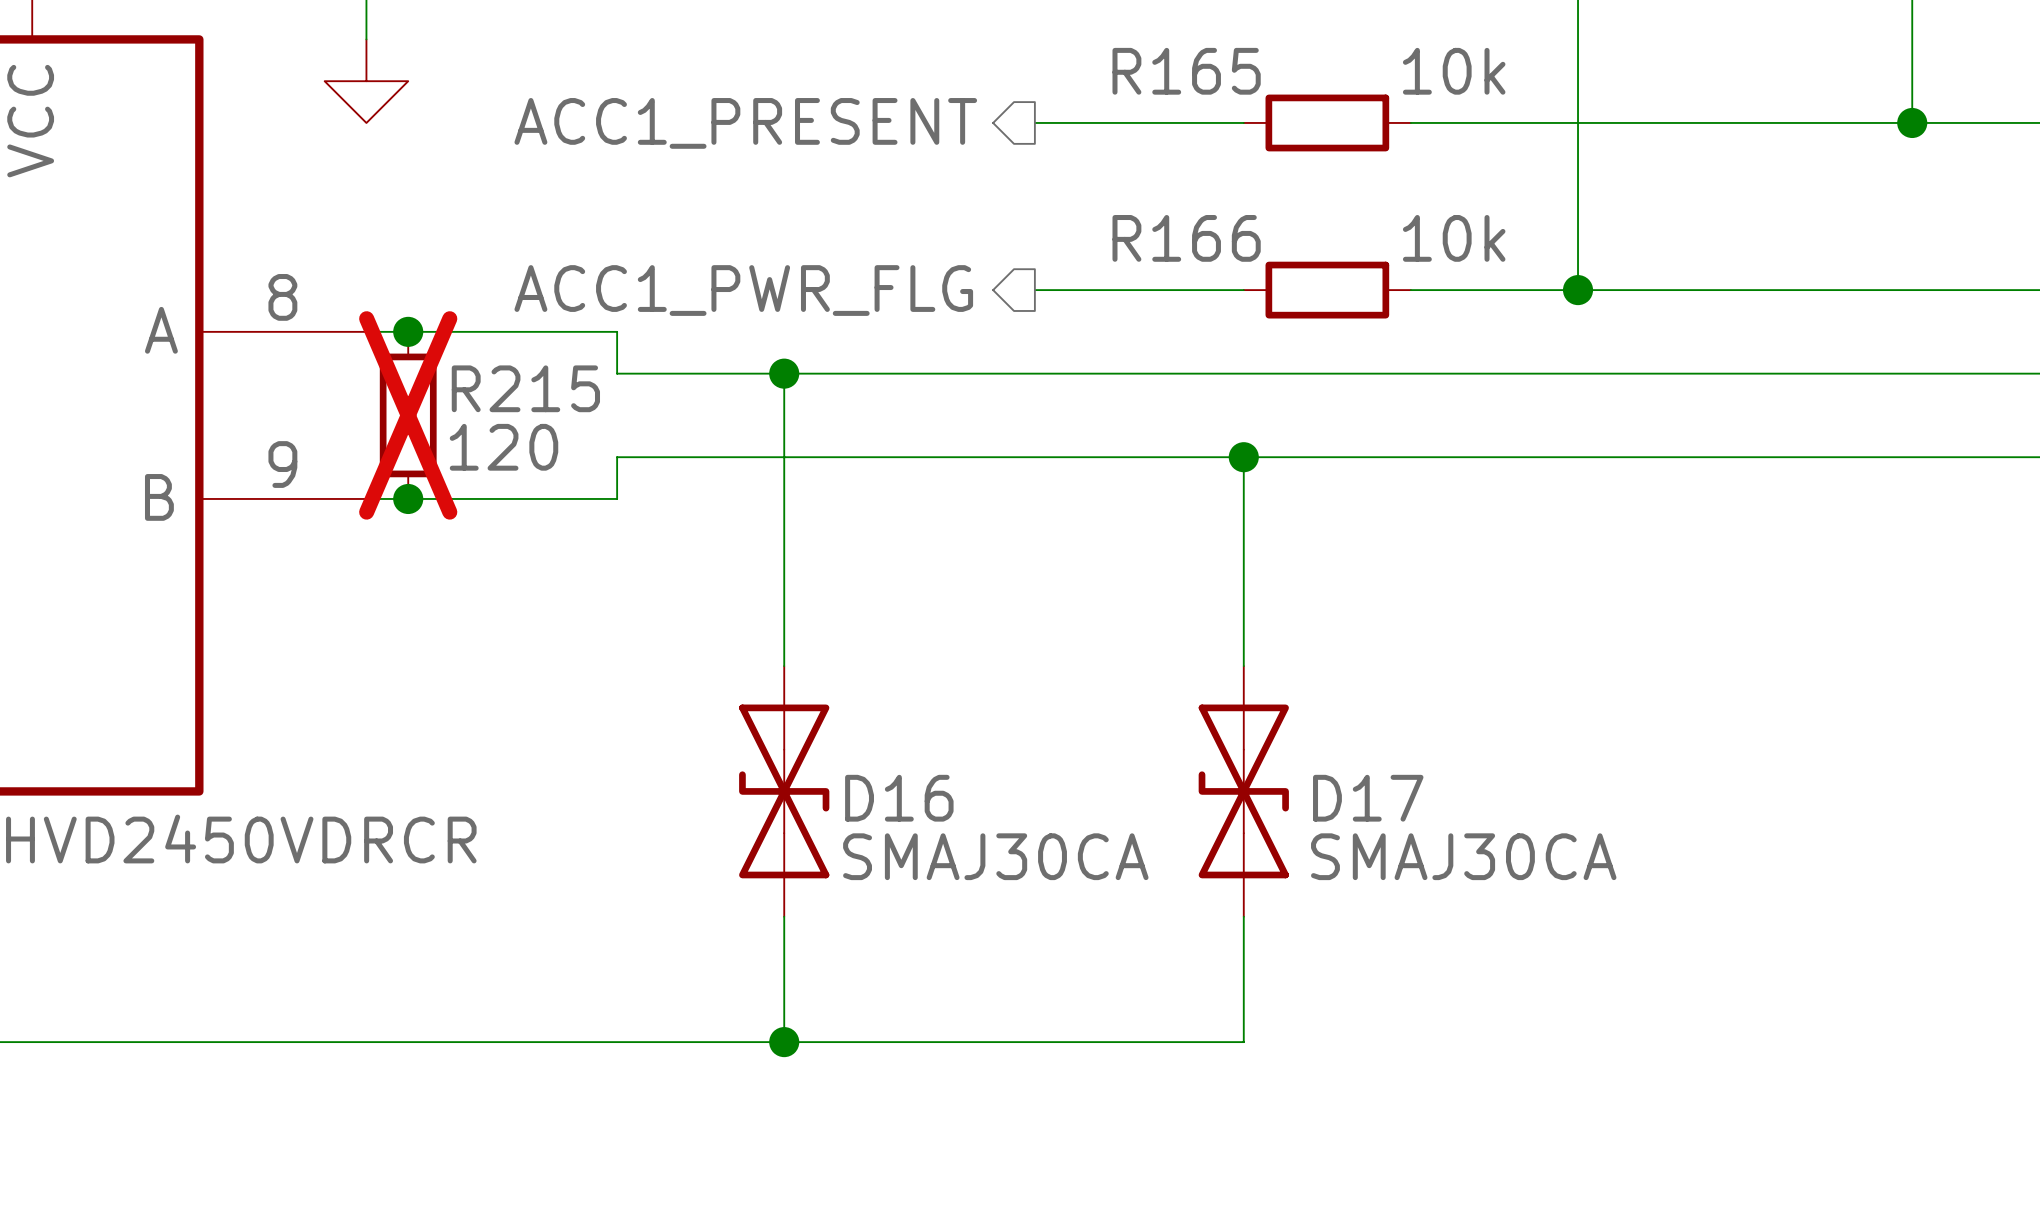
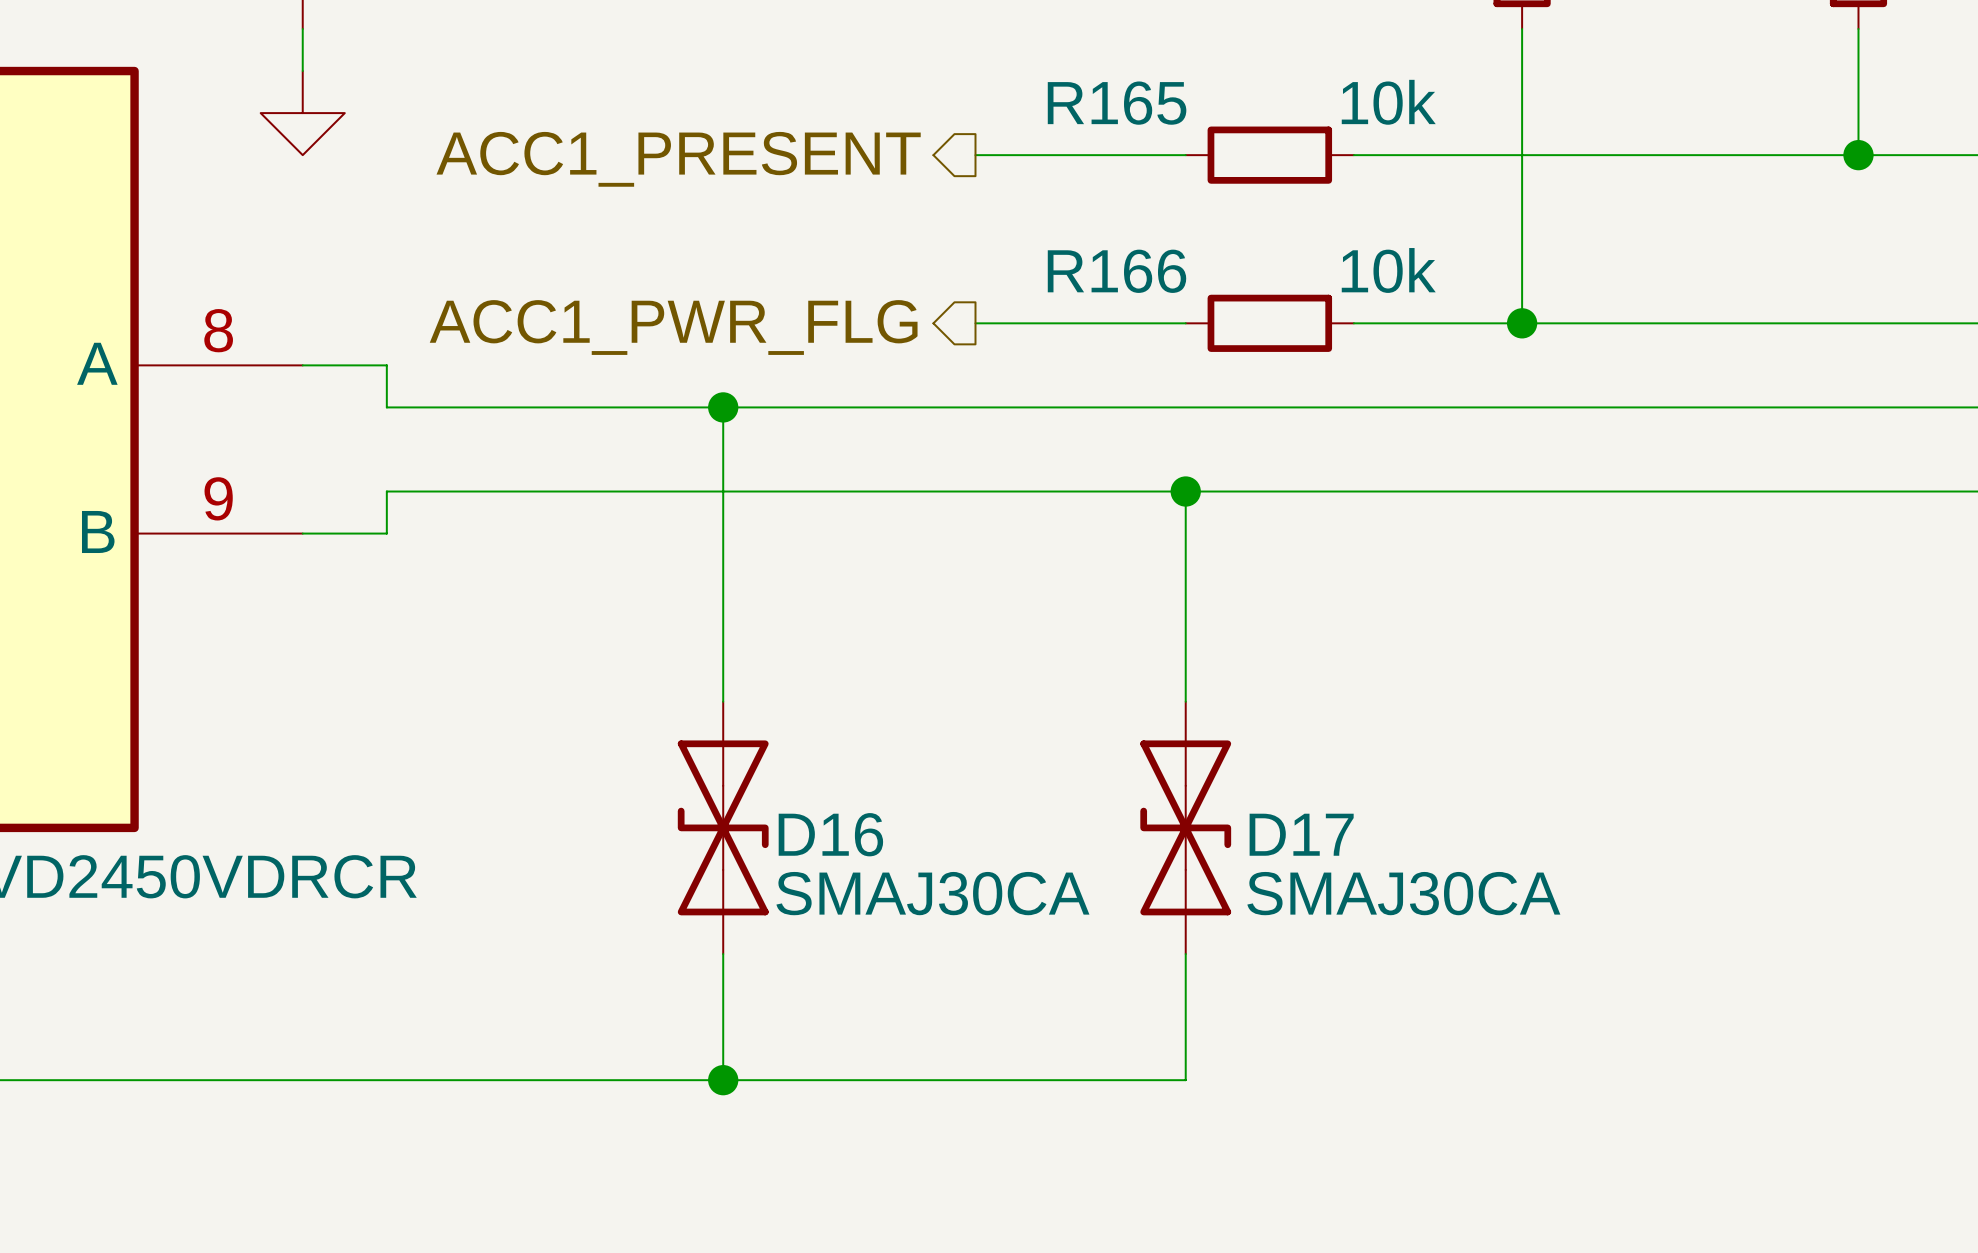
junction: (408, 331) -> none
wire: (450, 331) (617, 331) (617, 373) -> (386, 365) (386, 407) (555, 407)
R215: 120 (408, 415) -> none
wire: (617, 457) (617, 498) (450, 498) -> (555, 491) (386, 491) (386, 533)
junction: (408, 498) -> none

